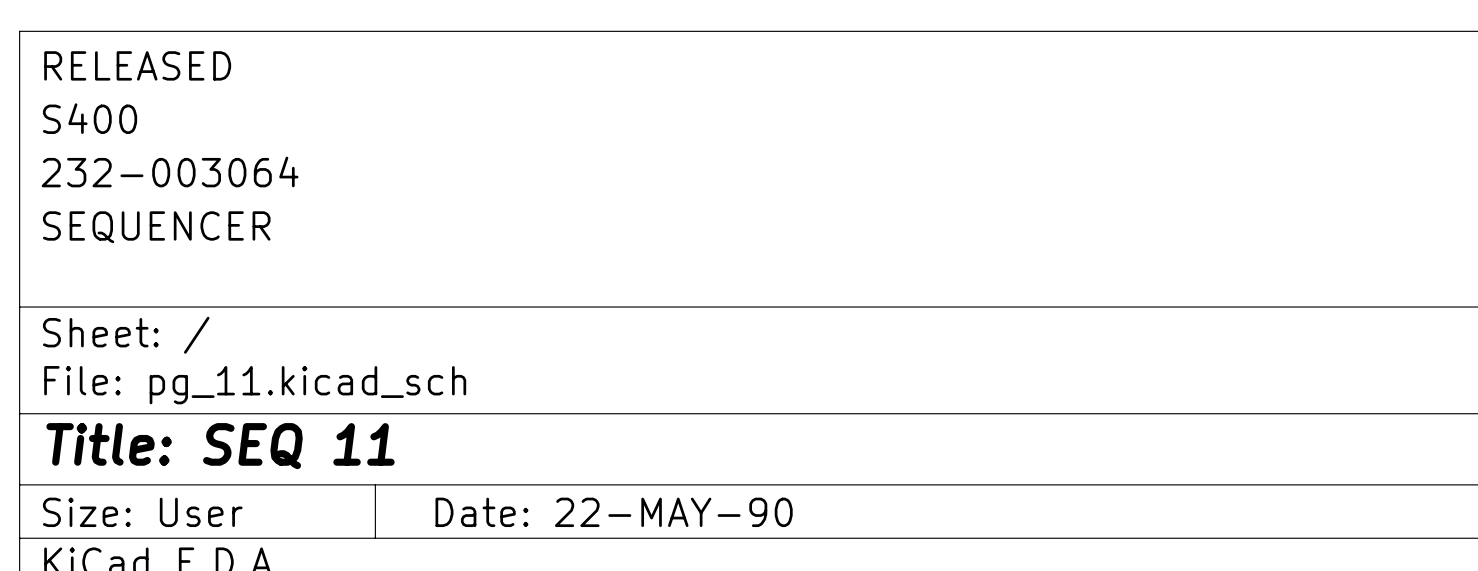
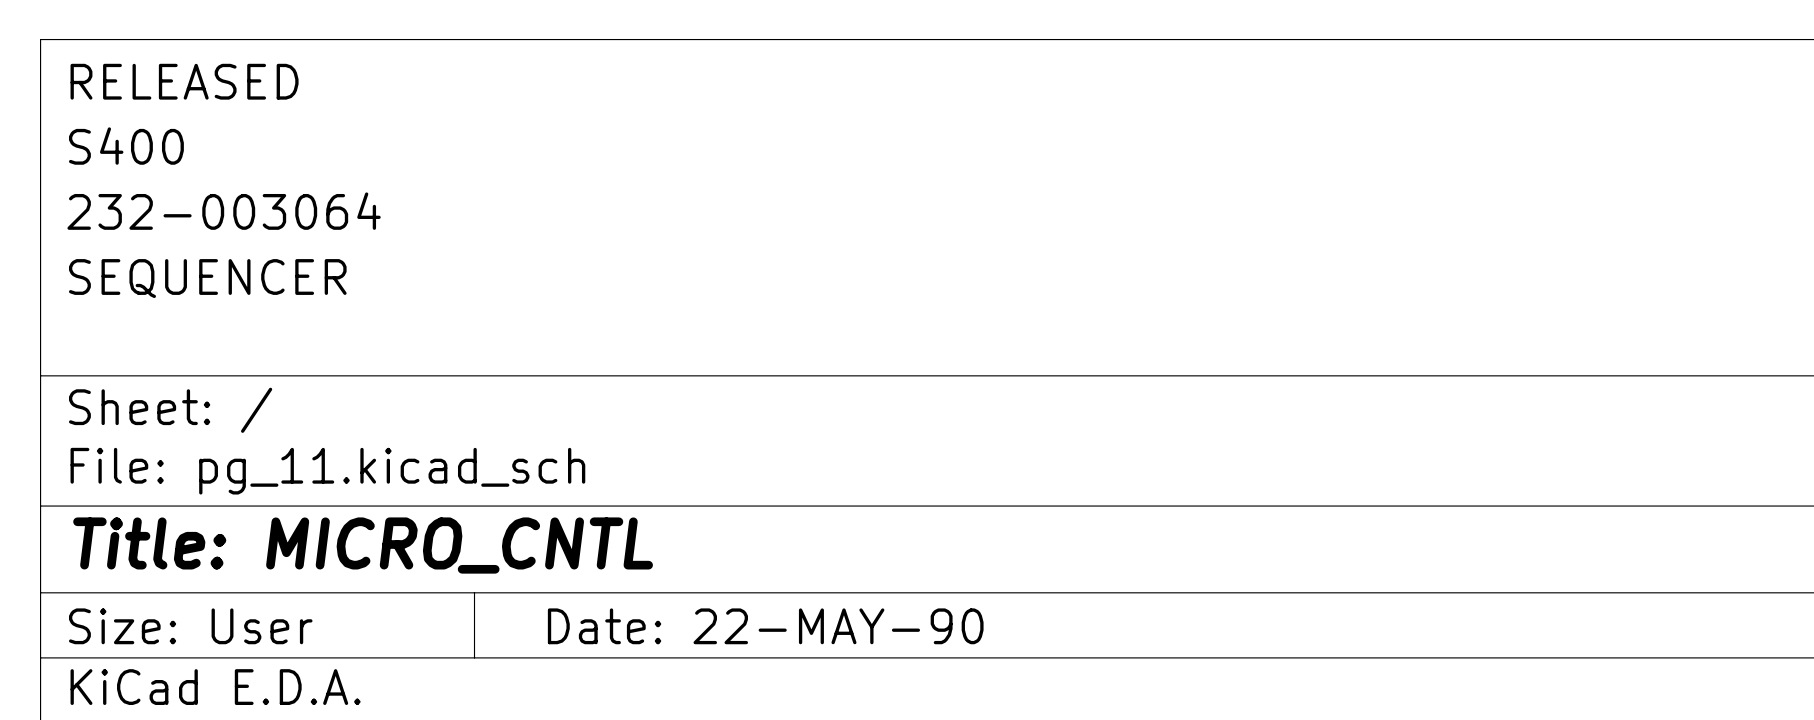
title block: Title: SEQ 11 (220, 446) -> Title: MICRO_CNTL (363, 545)

